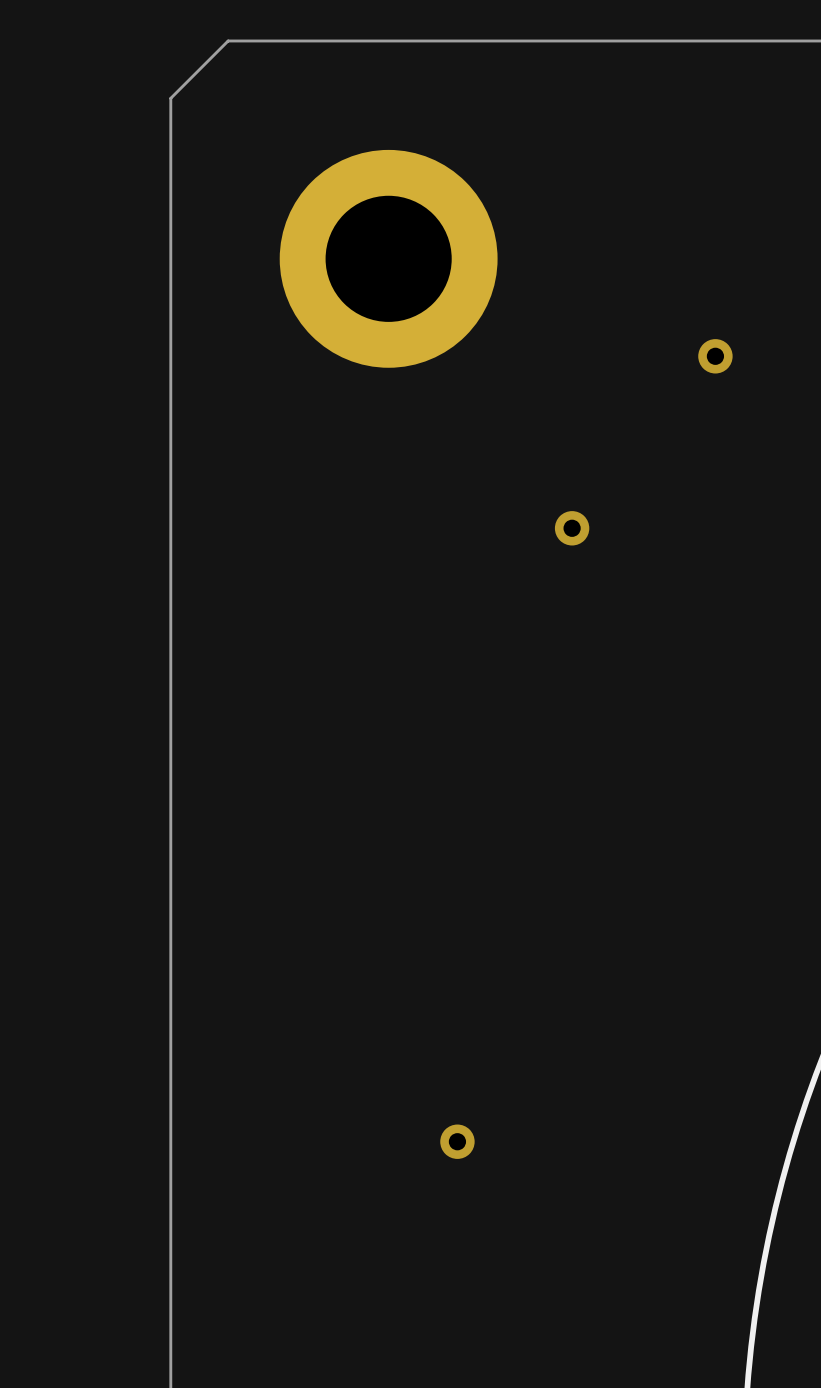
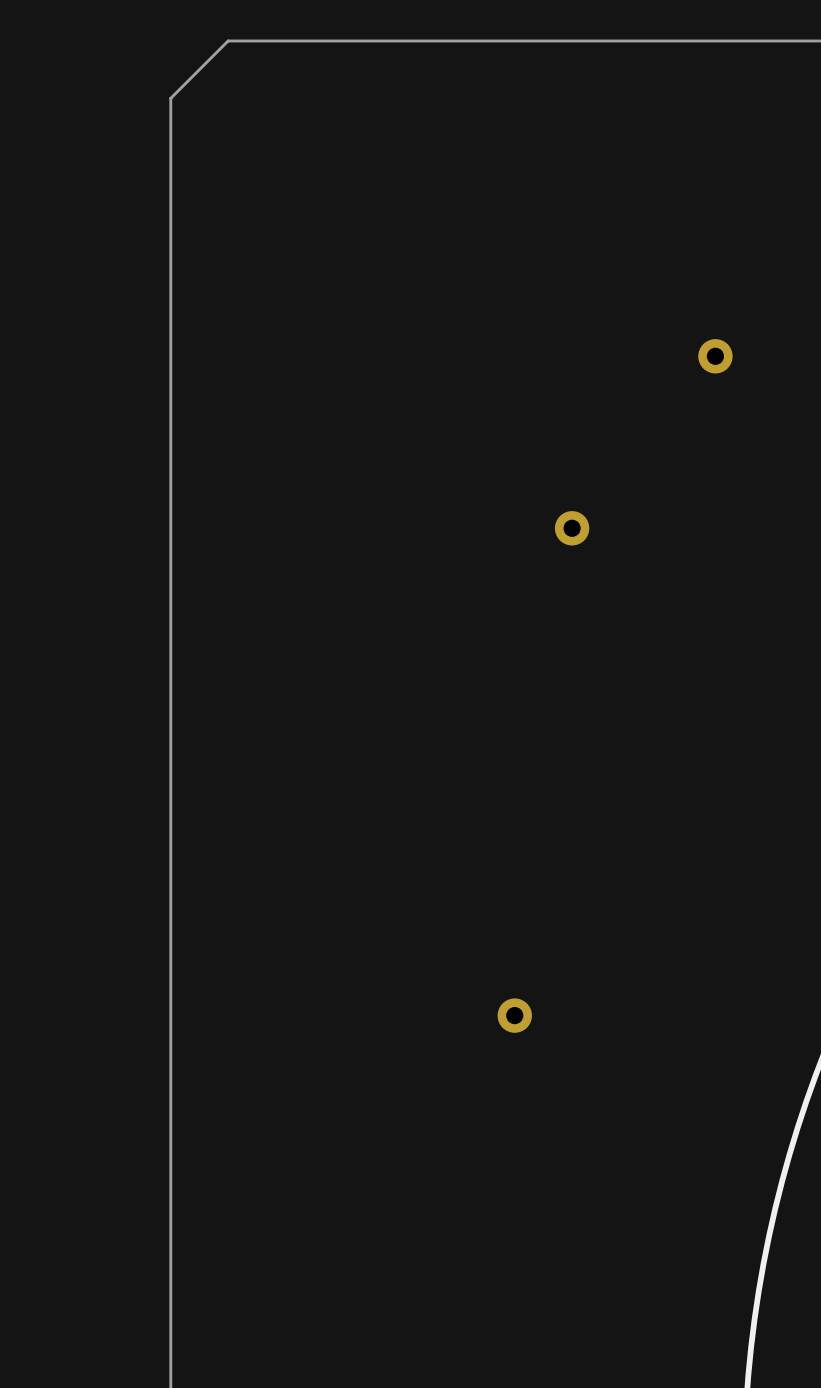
part: (388, 258) -> none
via position: (457, 1141) -> (514, 1015)

